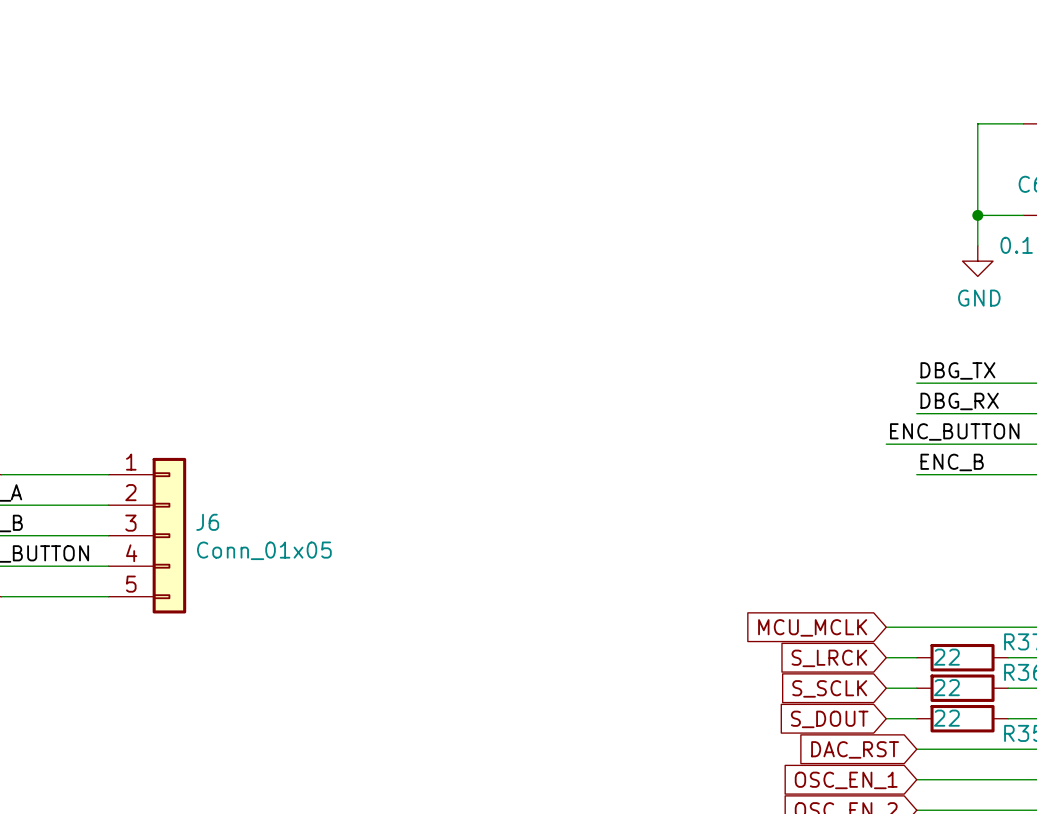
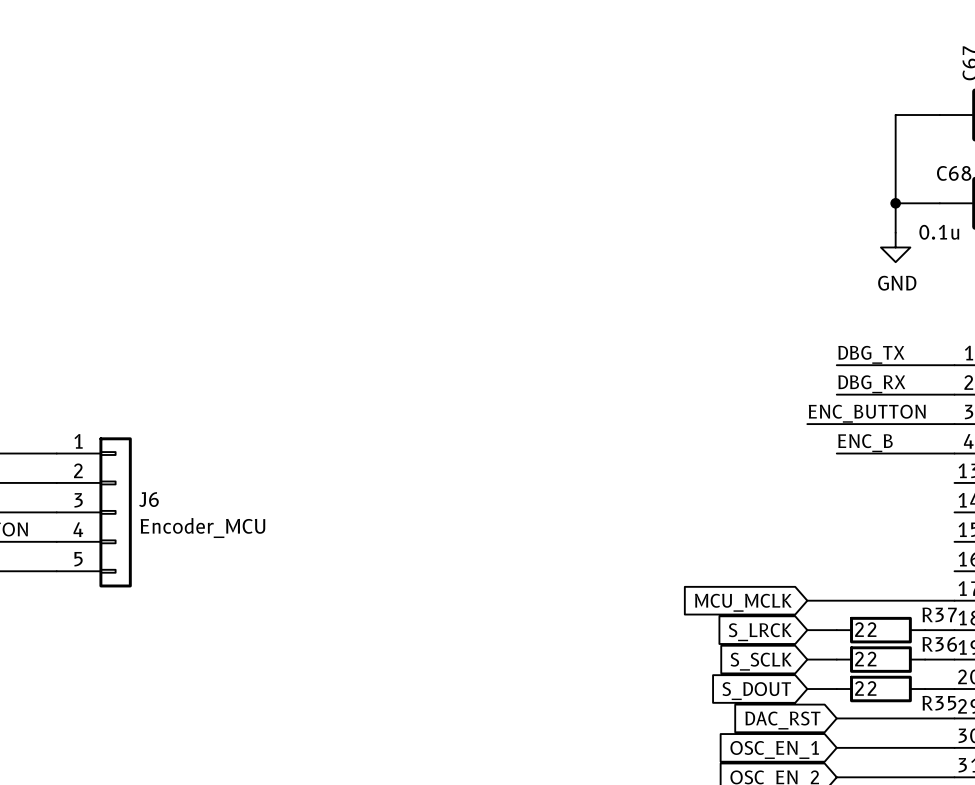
J6 value: Conn_01x05 (264, 550) -> Encoder_MCU (202, 527)

